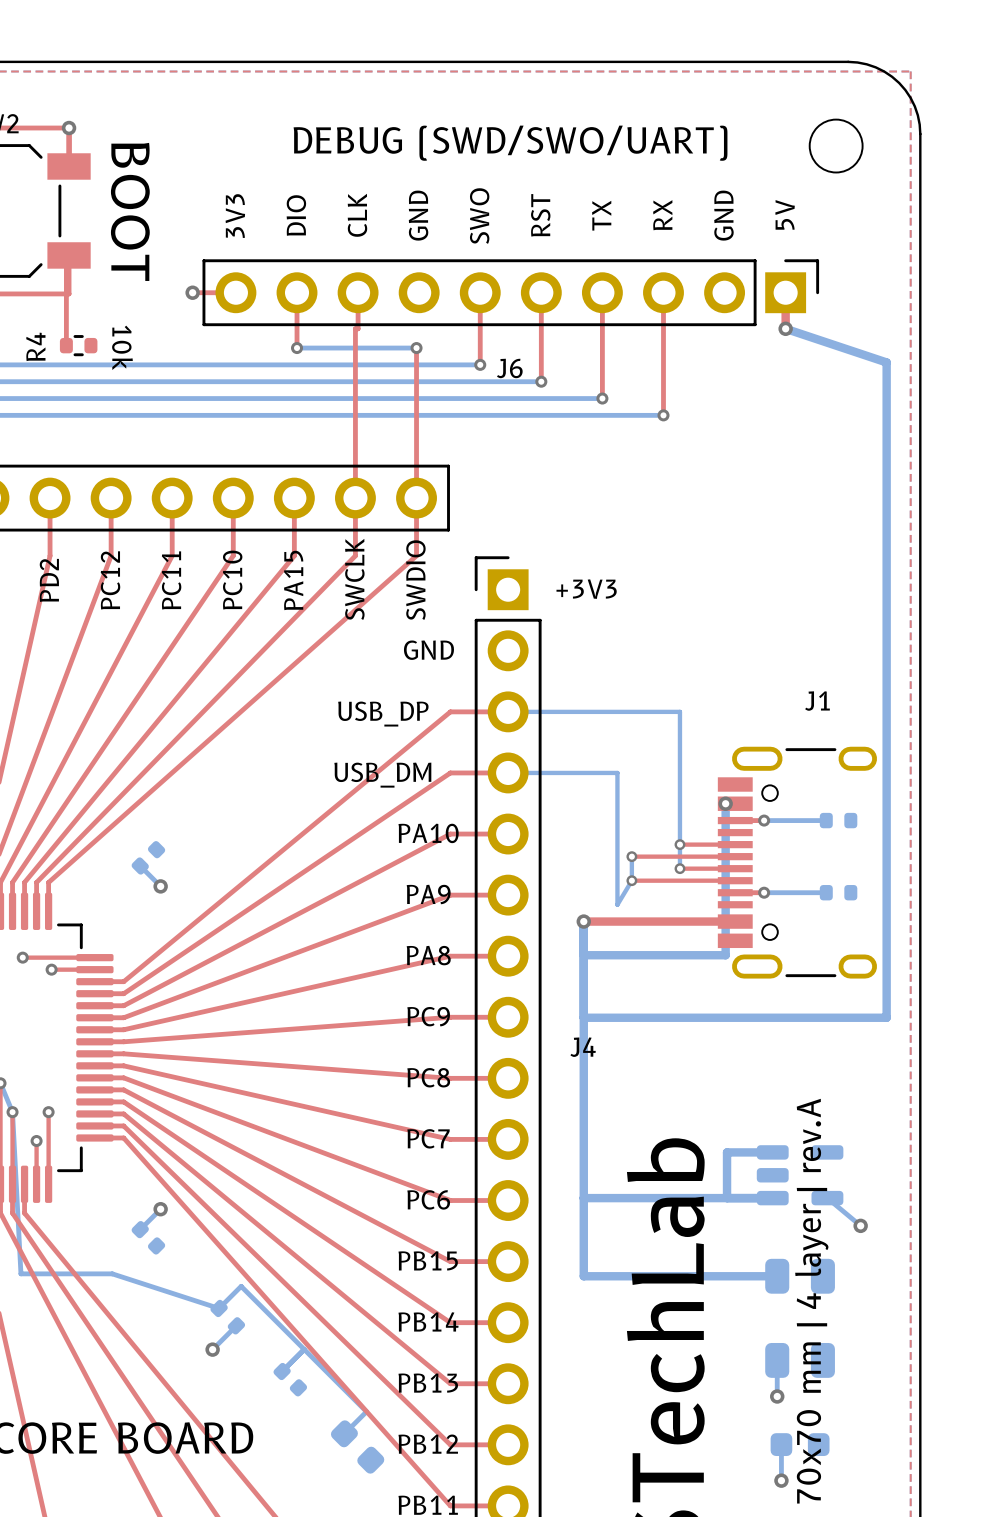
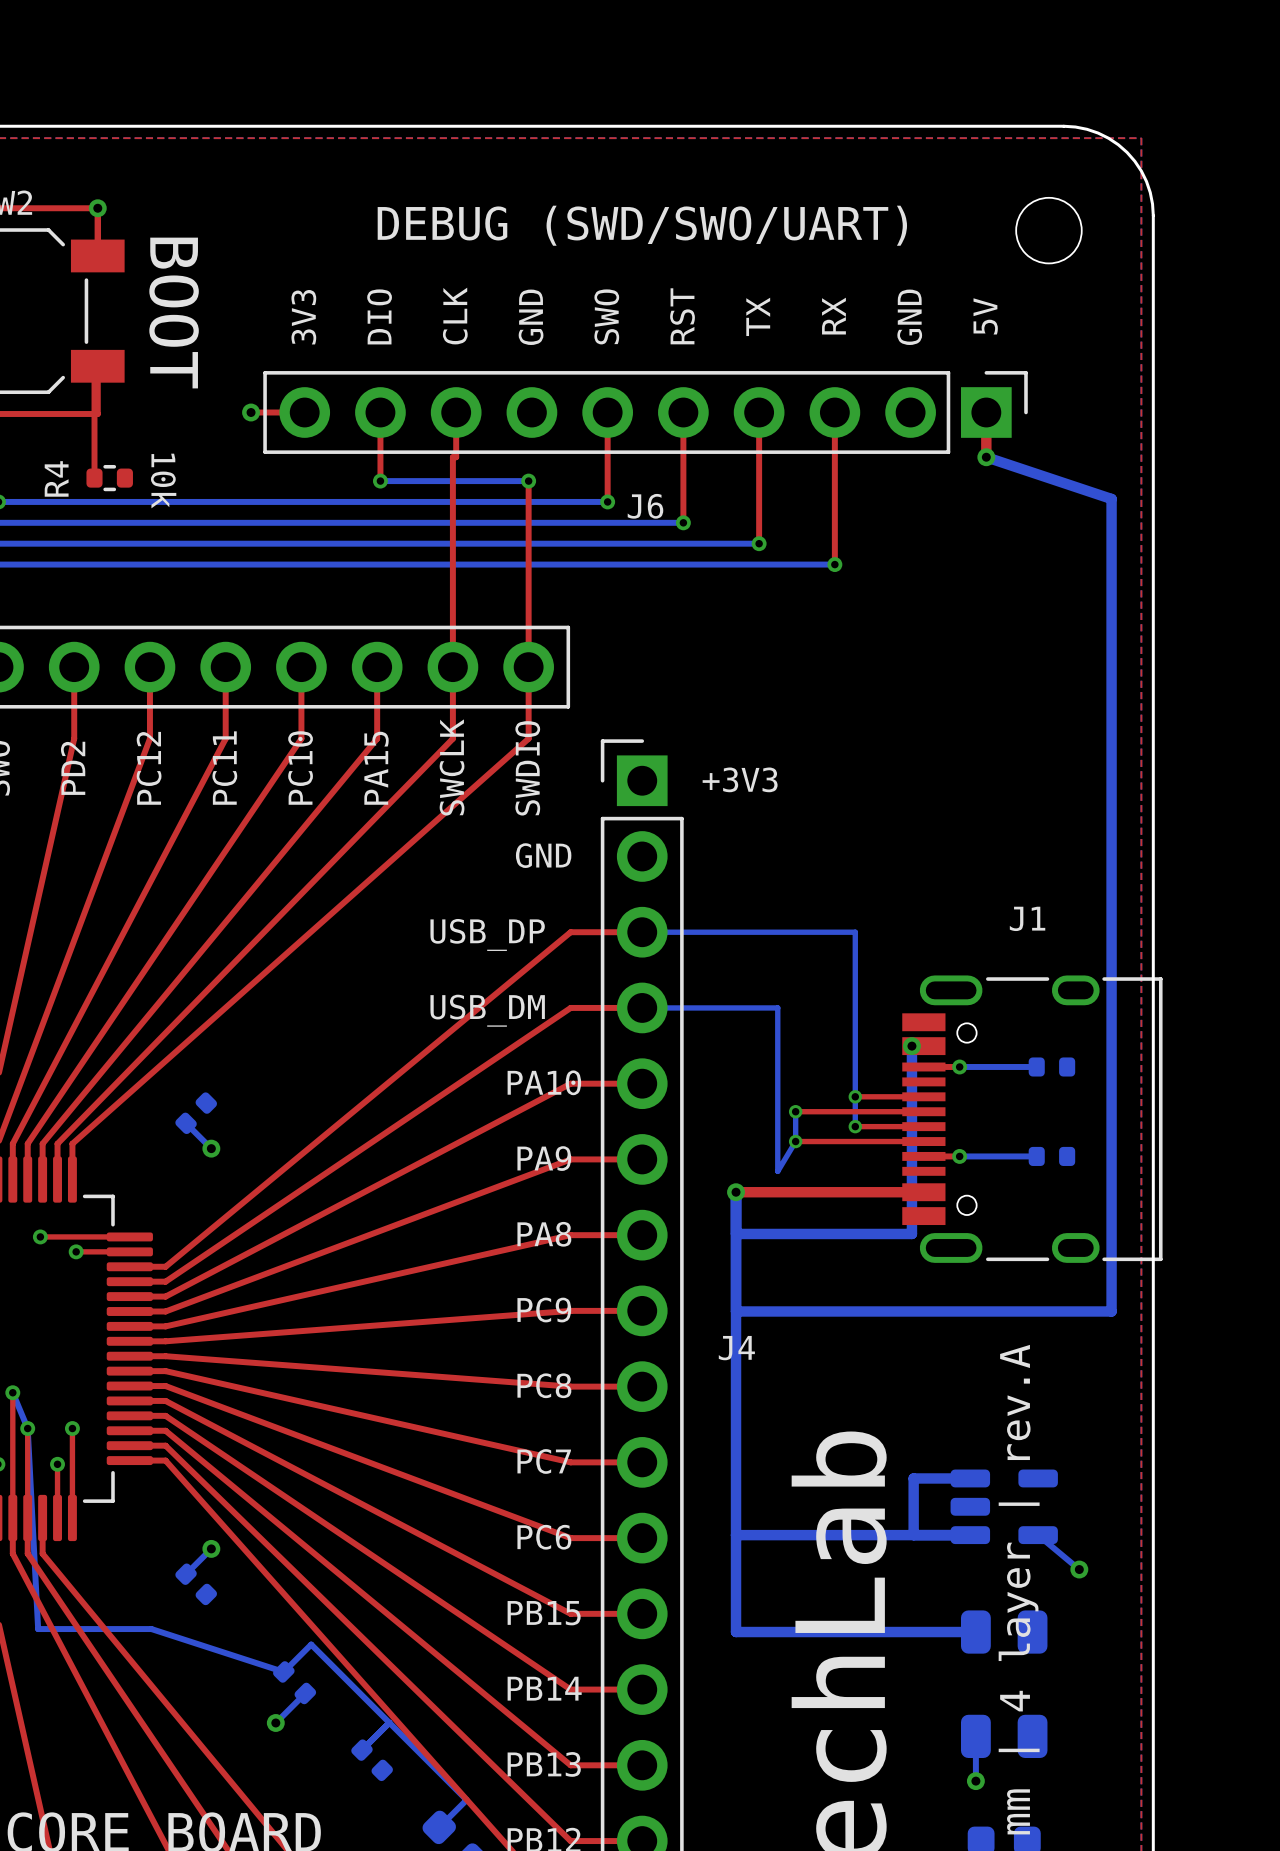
J1 footprint: [717, 746, 878, 979] -> [902, 975, 1163, 1263]

